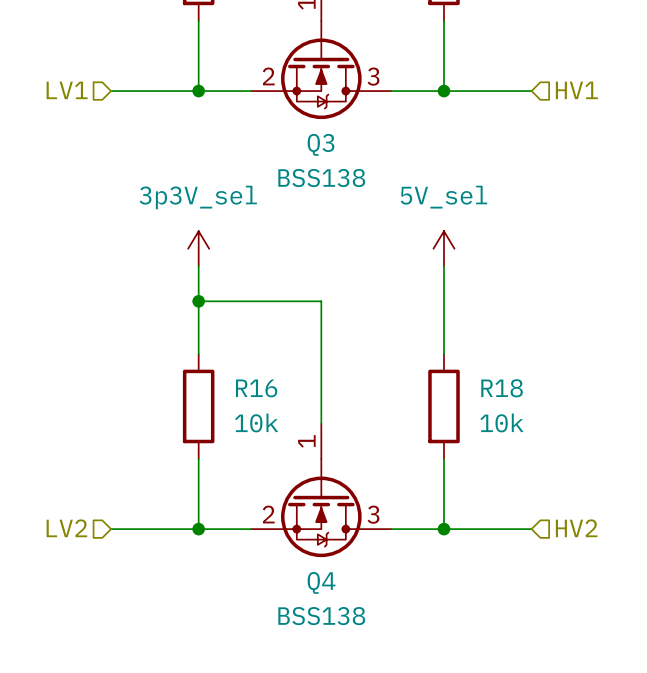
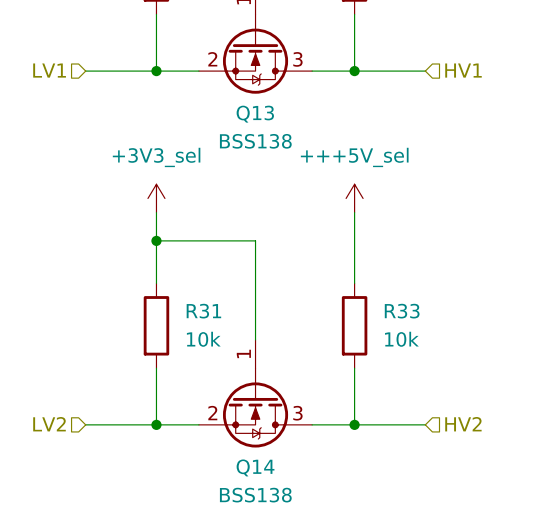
Q3 name: Q3 (321, 144) -> Q13 (255, 114)
power symbol: 3p3V_sel (198, 248) -> +3V3_sel (156, 198)
power symbol: 5V_sel (443, 248) -> +++5V_sel (354, 198)
R16 name: R16 (256, 388) -> R31 (203, 311)
R18 name: R18 (502, 388) -> R33 (402, 311)
Q4 name: Q4 (321, 582) -> Q14 (255, 467)

